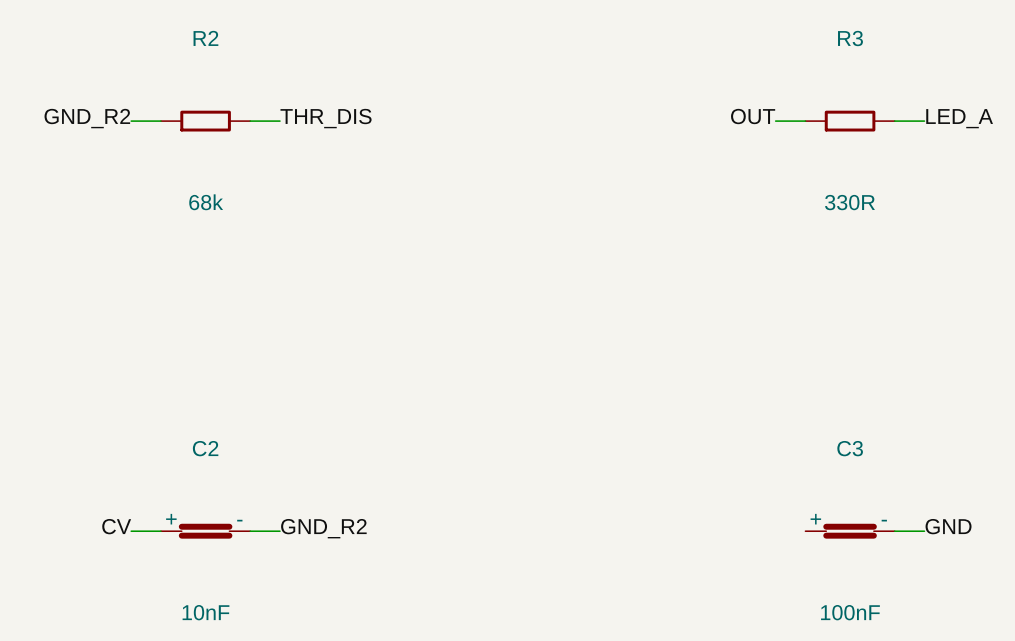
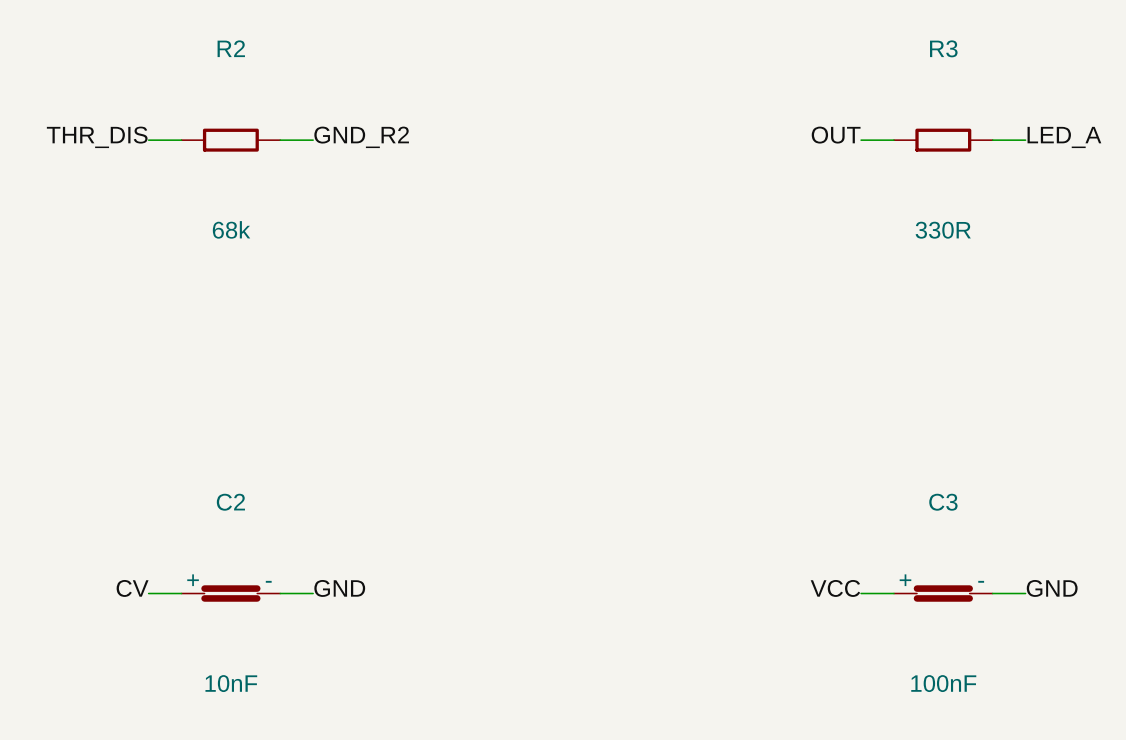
label: GND_R2 (87, 118) -> THR_DIS (97, 137)
label: THR_DIS (326, 118) -> GND_R2 (361, 137)
label: none -> VCC (835, 588)
label: GND_R2 (323, 528) -> GND (339, 588)
wire: none -> (861, 593) (893, 593)

